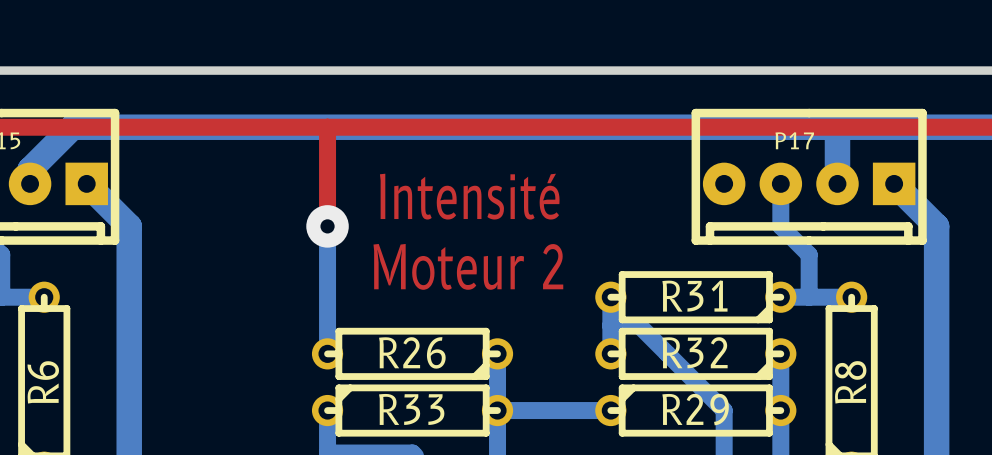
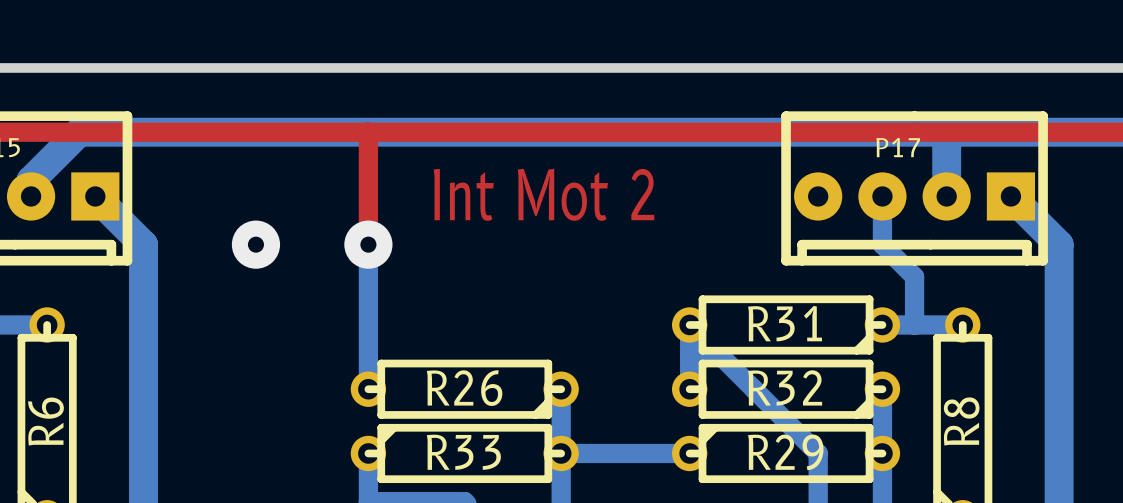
text: Intensité (469, 196) -> Int Mot 2 (544, 194)
via: none -> (255, 244)
text: Moteur 2 (468, 266) -> none

